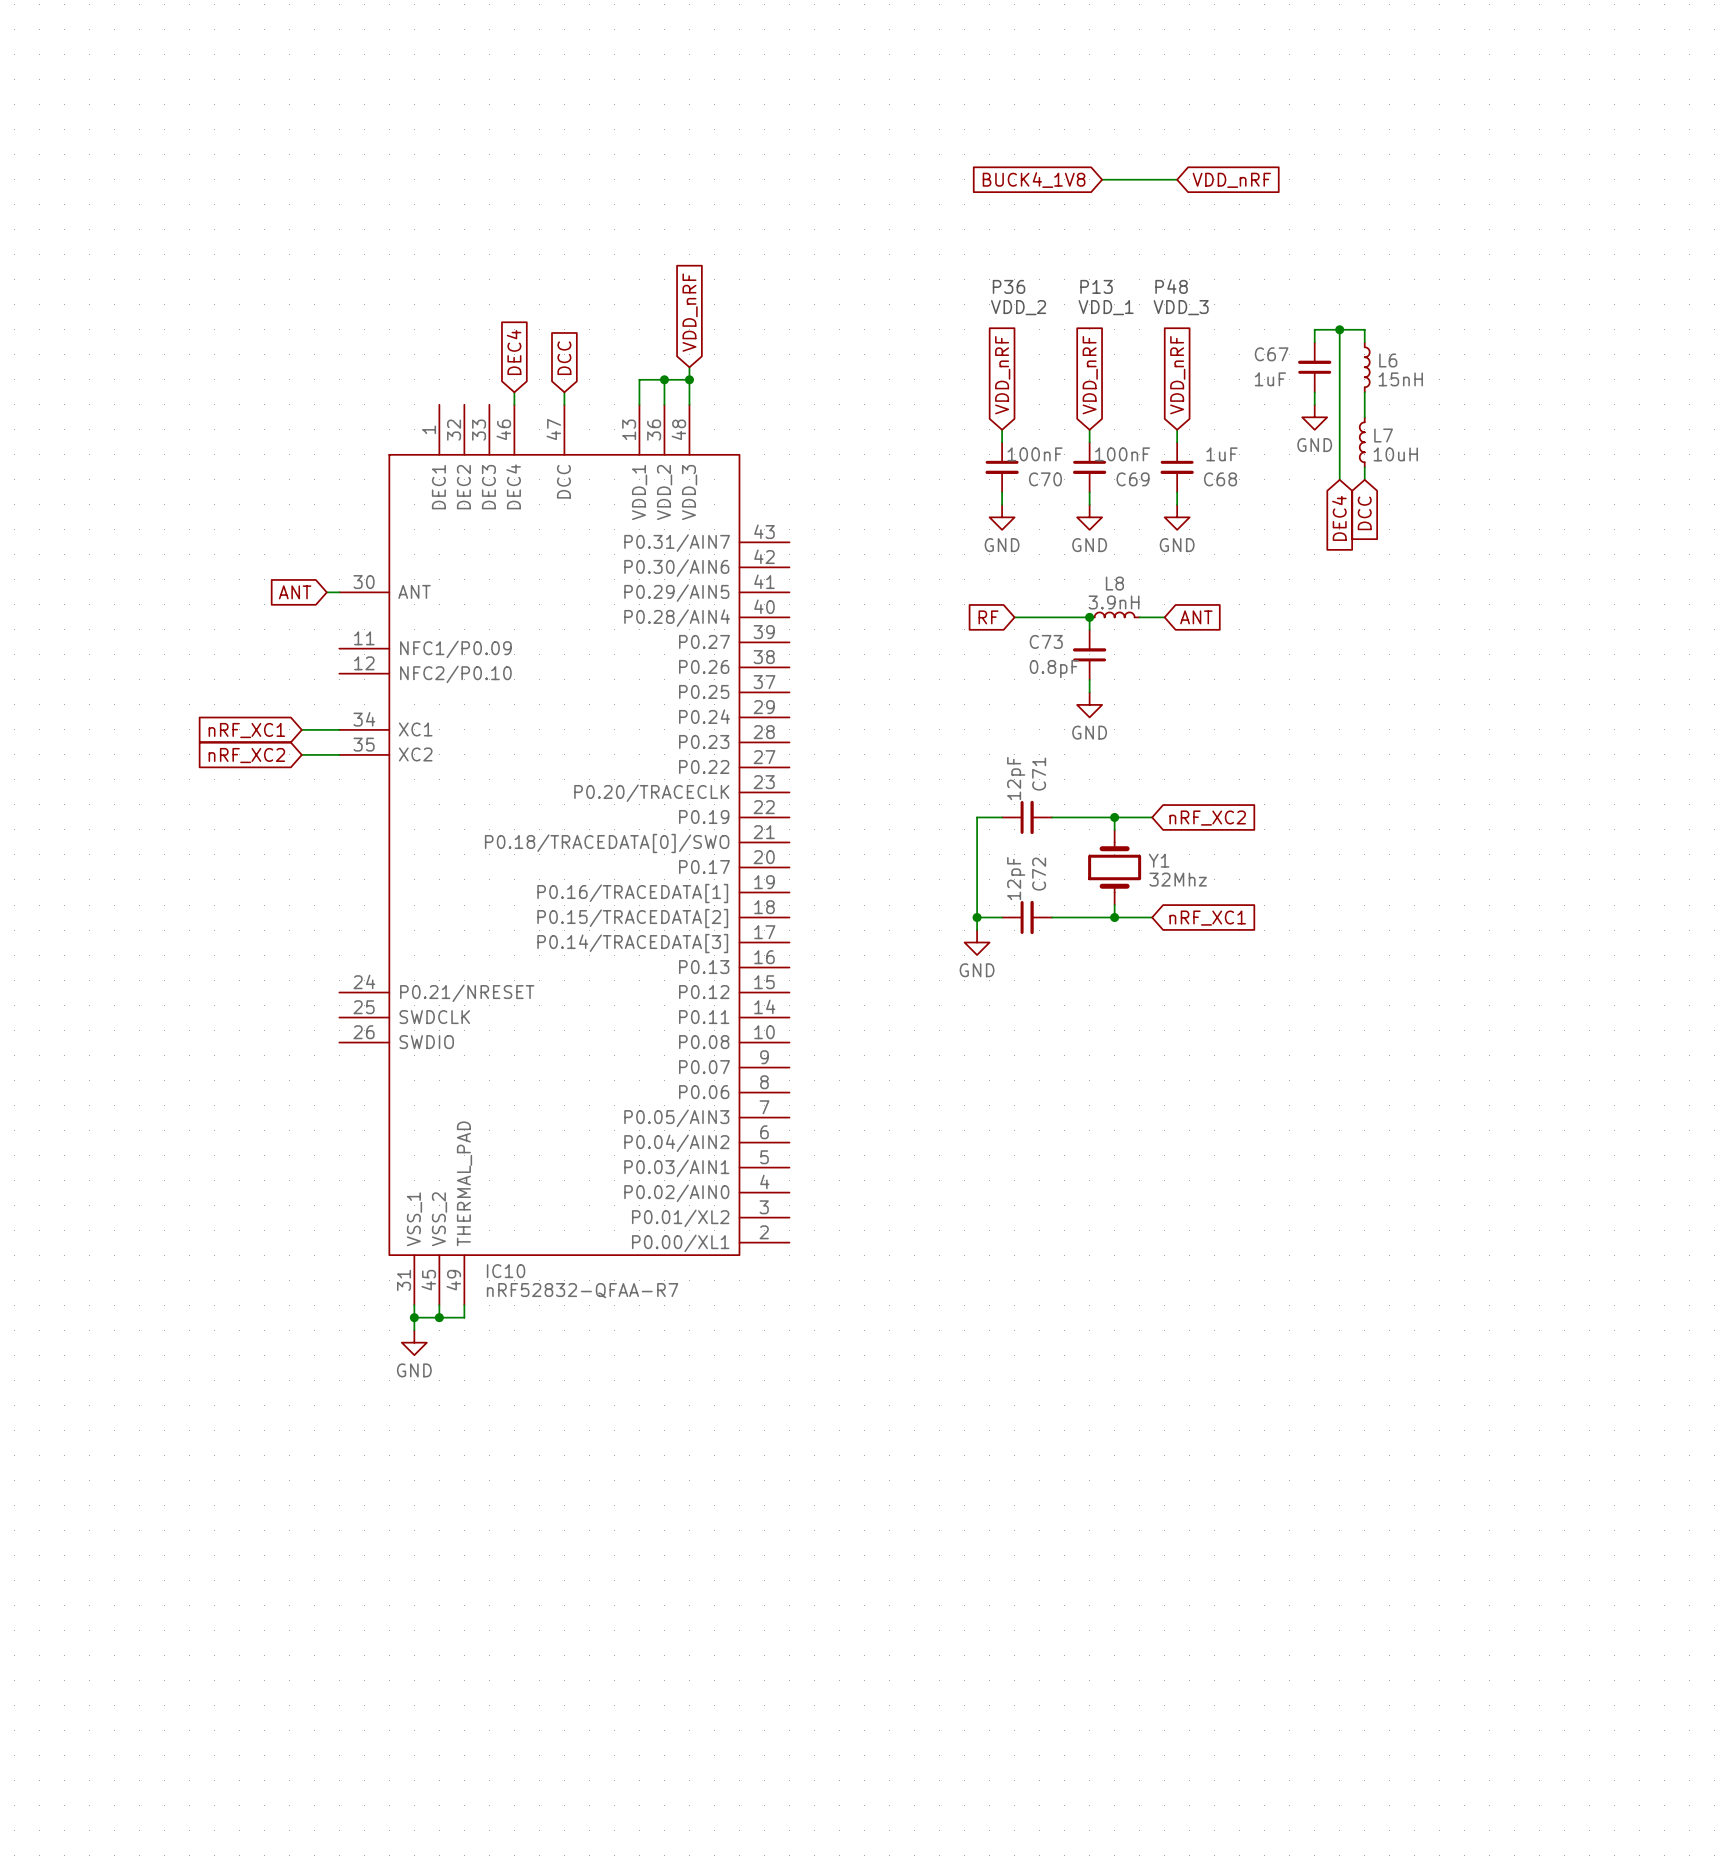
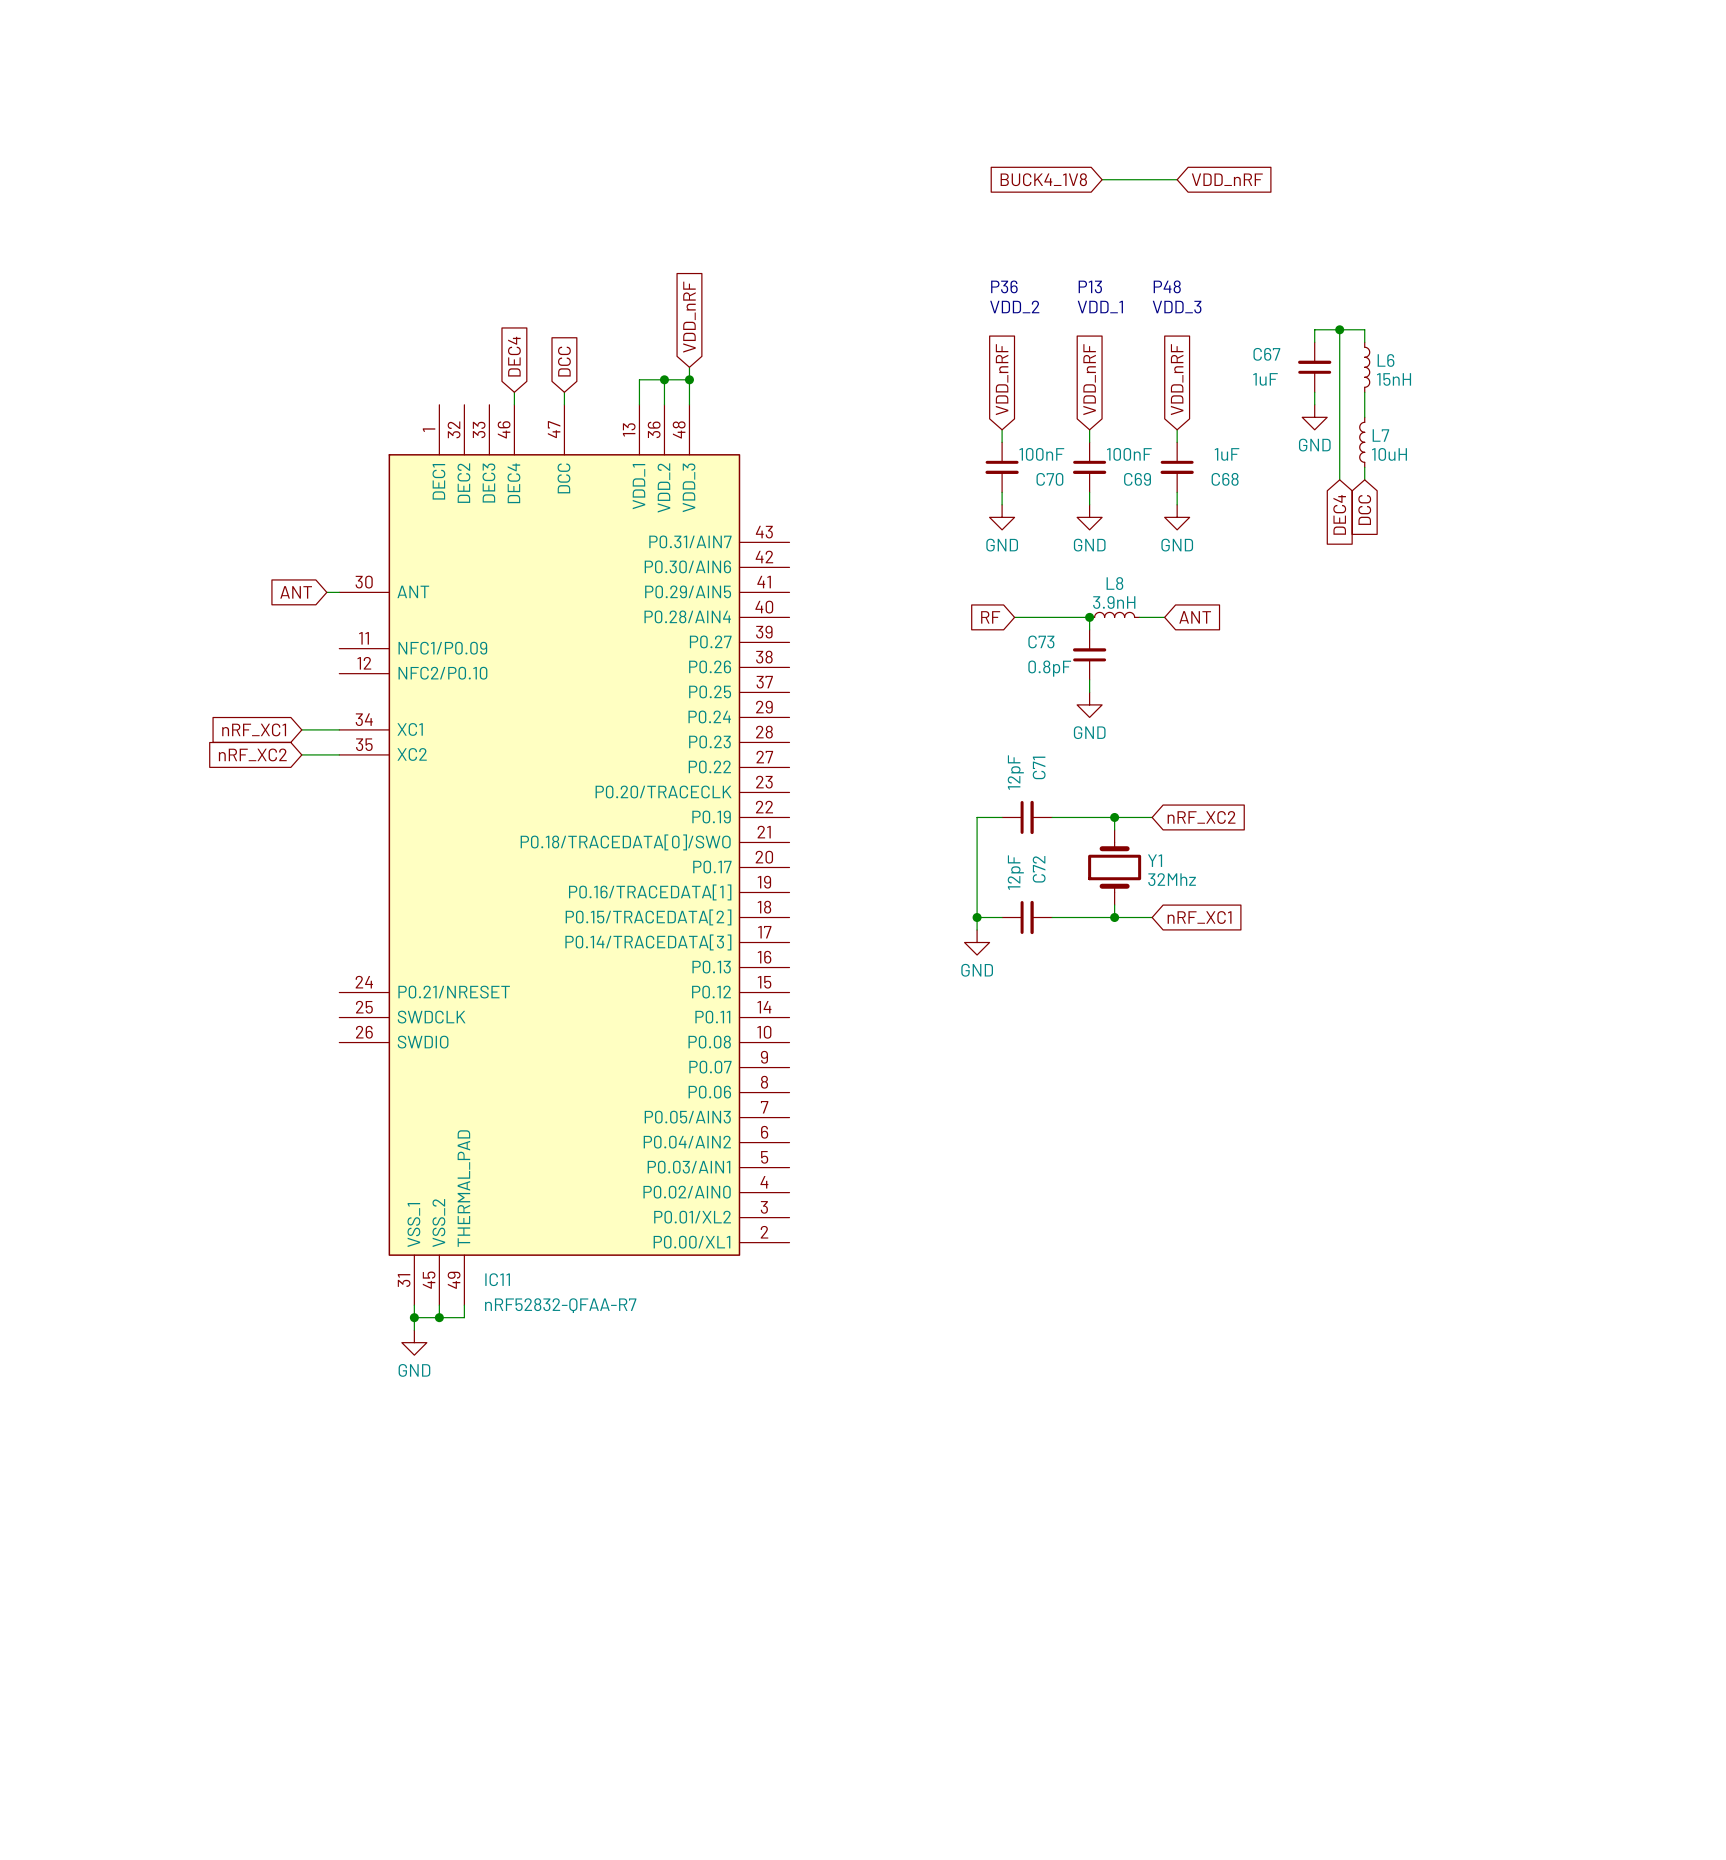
IC10: nRF52832-QFAA-R7 (564, 854) -> none
IC11: none -> nRF52832-QFAA-R7 (564, 854)

